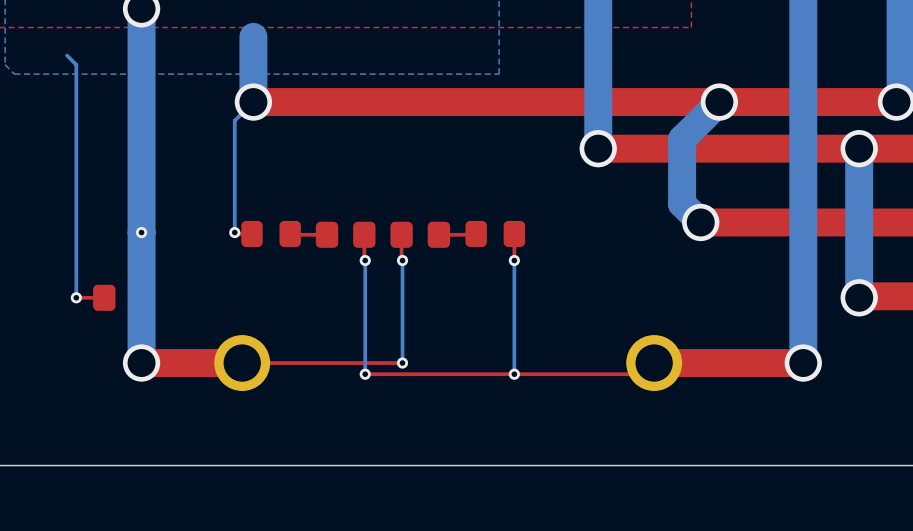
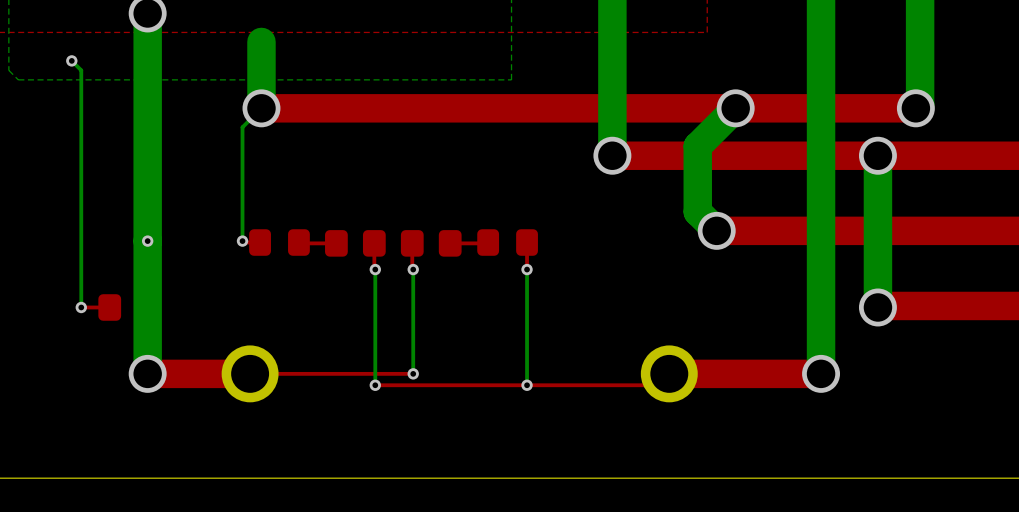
via: none -> (71, 60)

